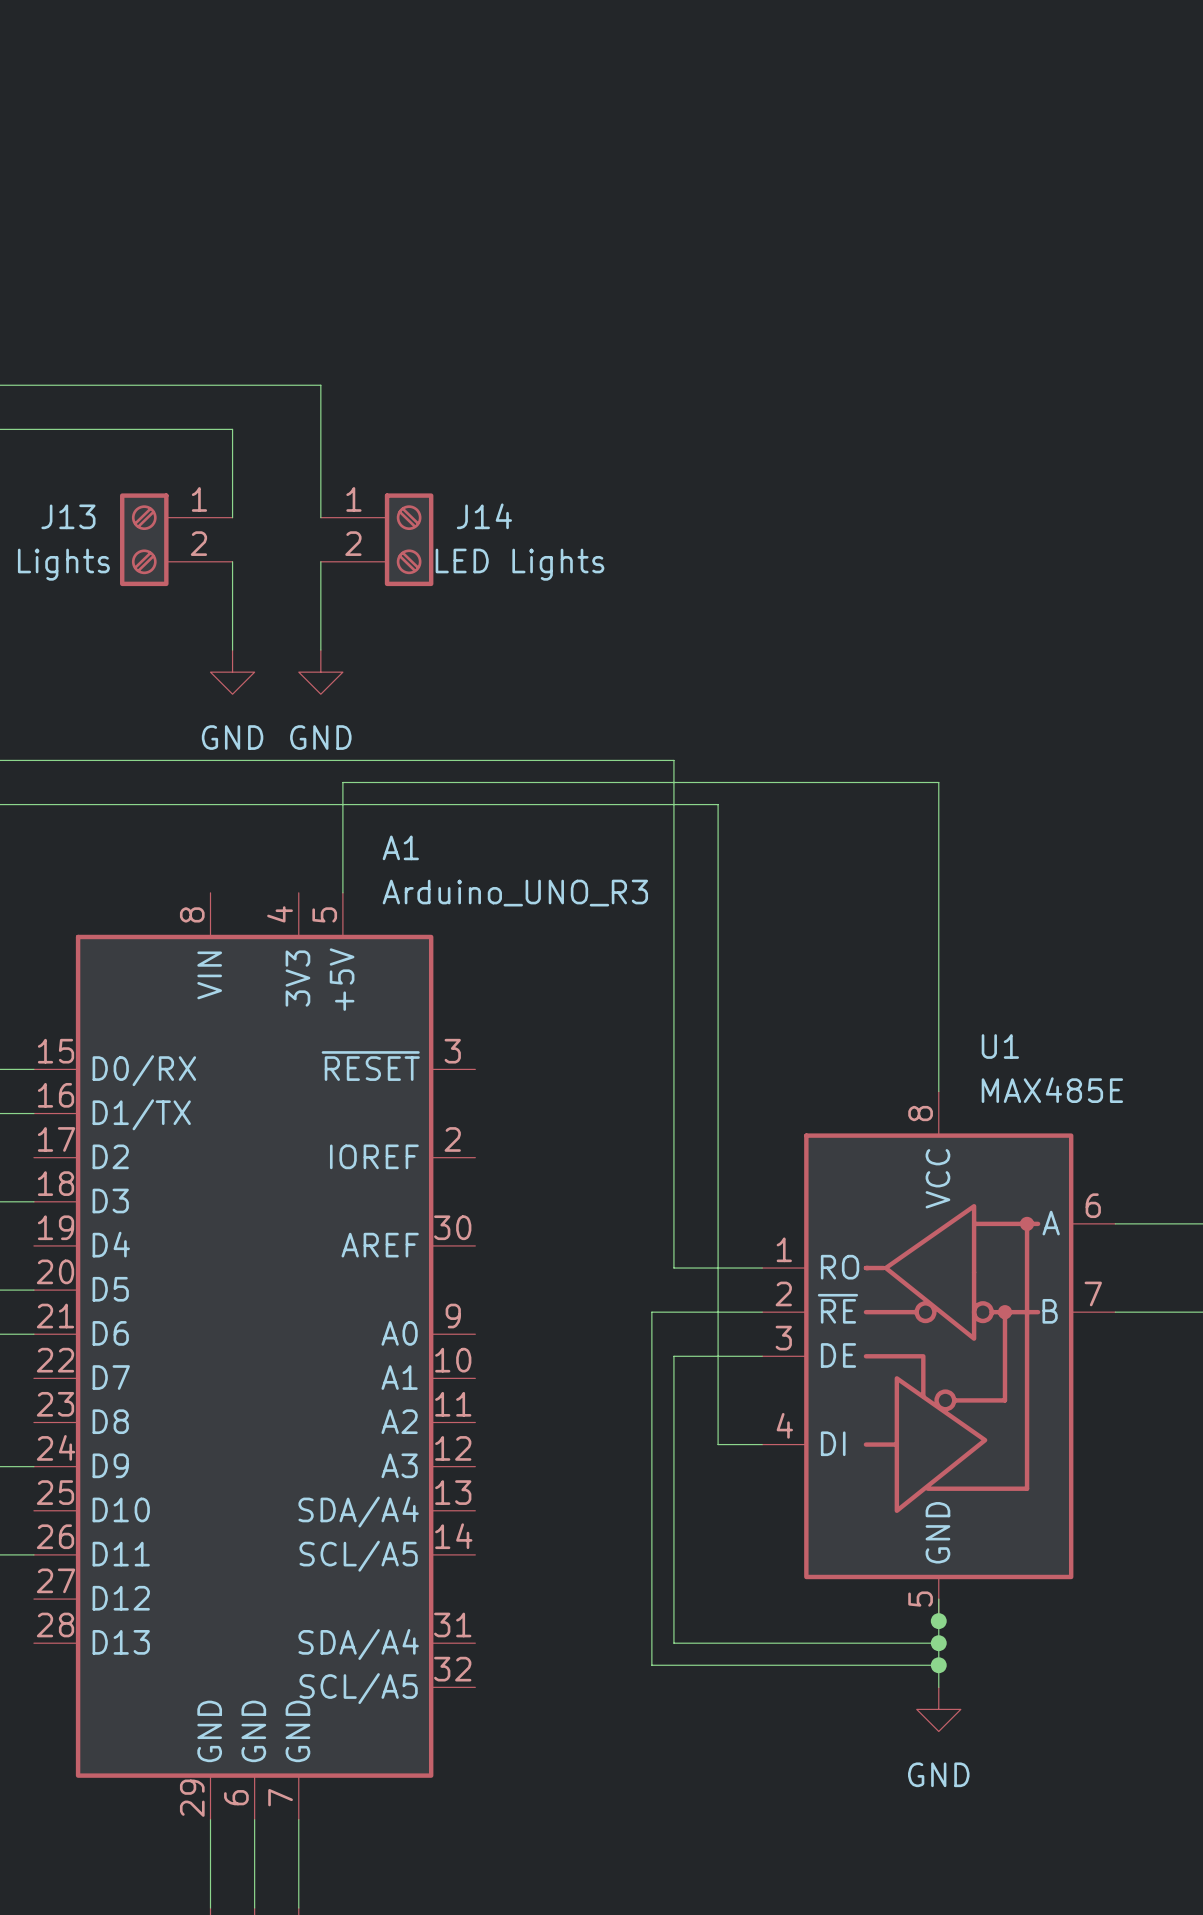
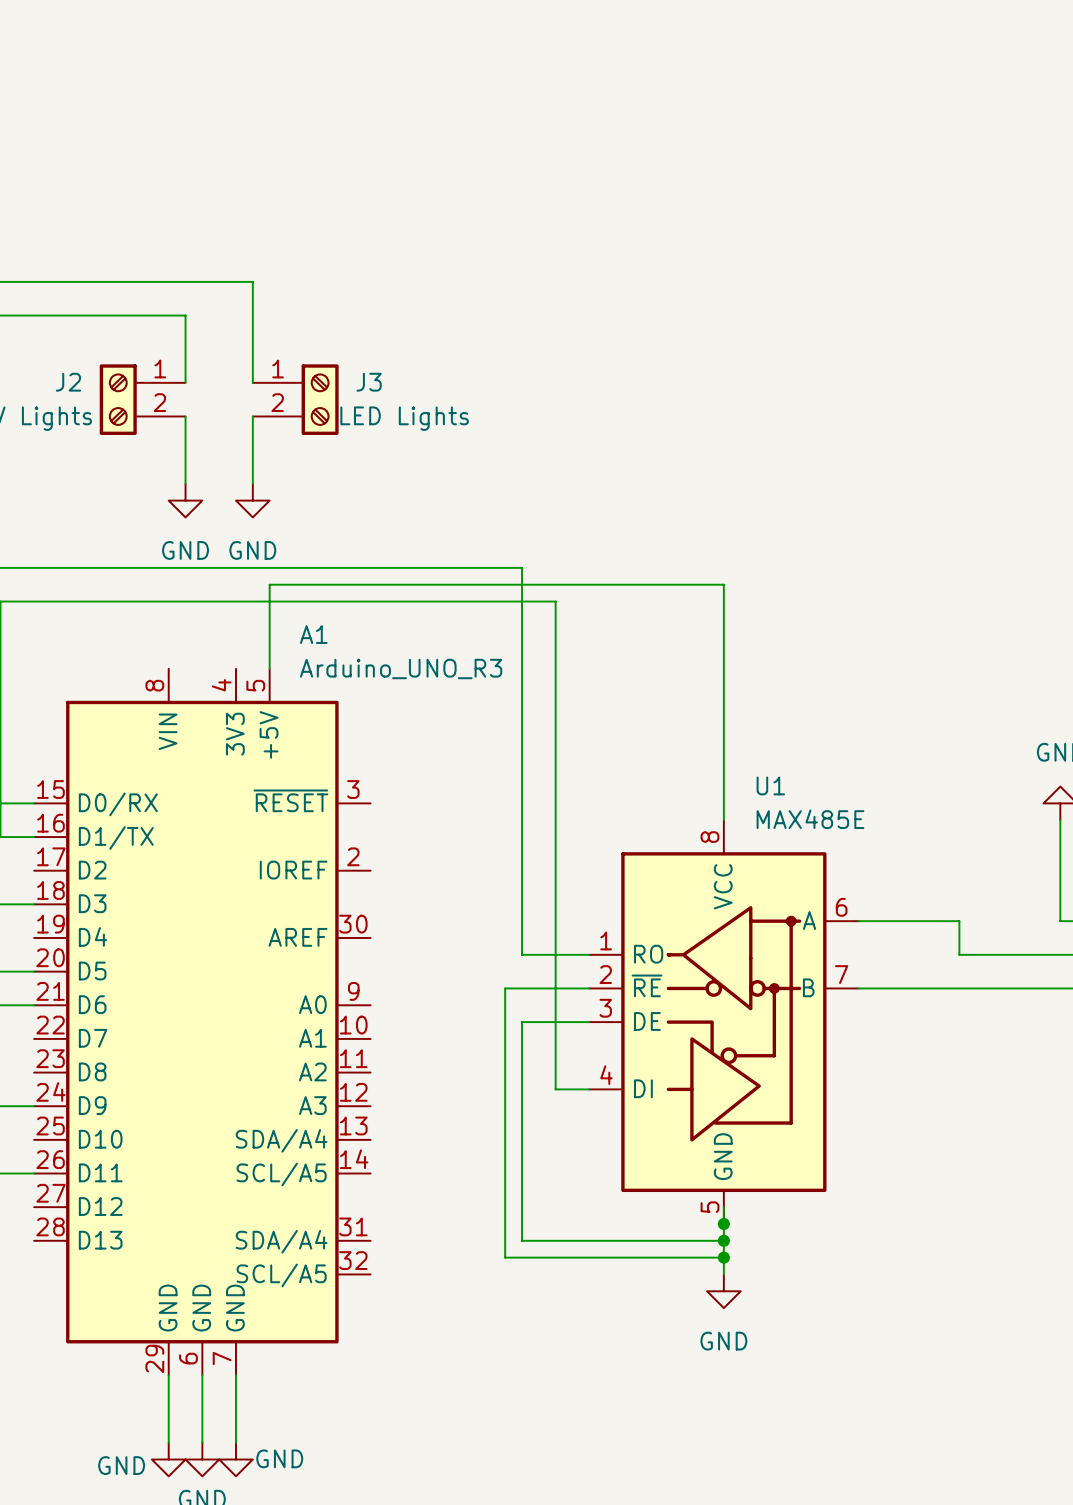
J13 name: J13 (68, 516) -> J2 (68, 382)
J14 name: J14 (484, 516) -> J3 (369, 382)

